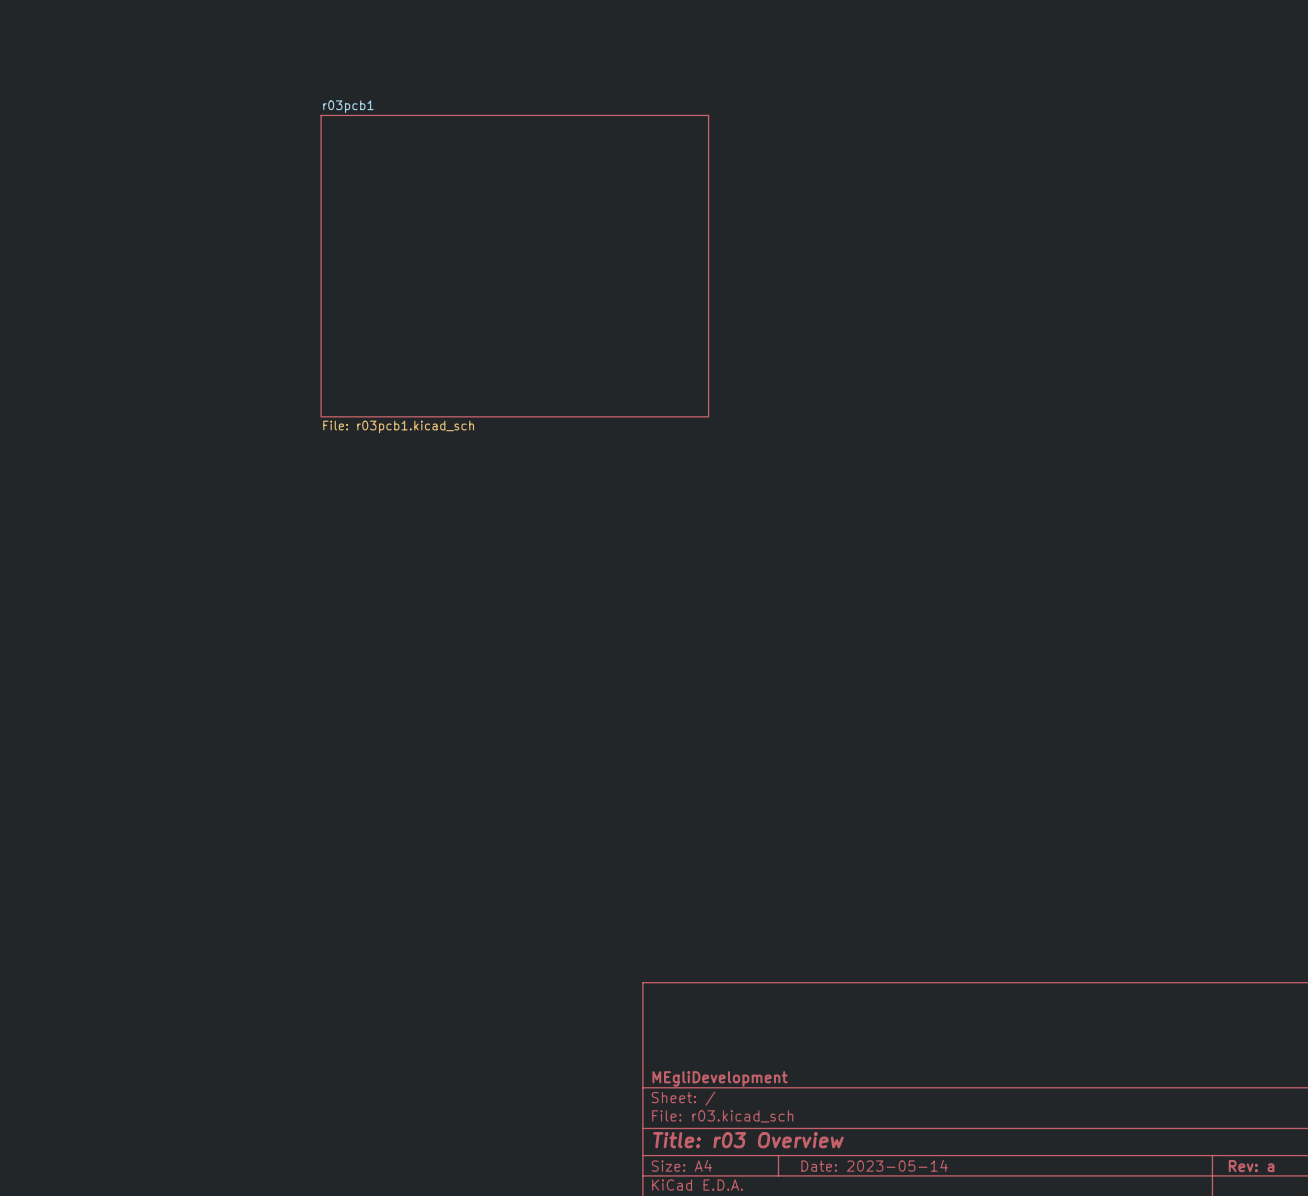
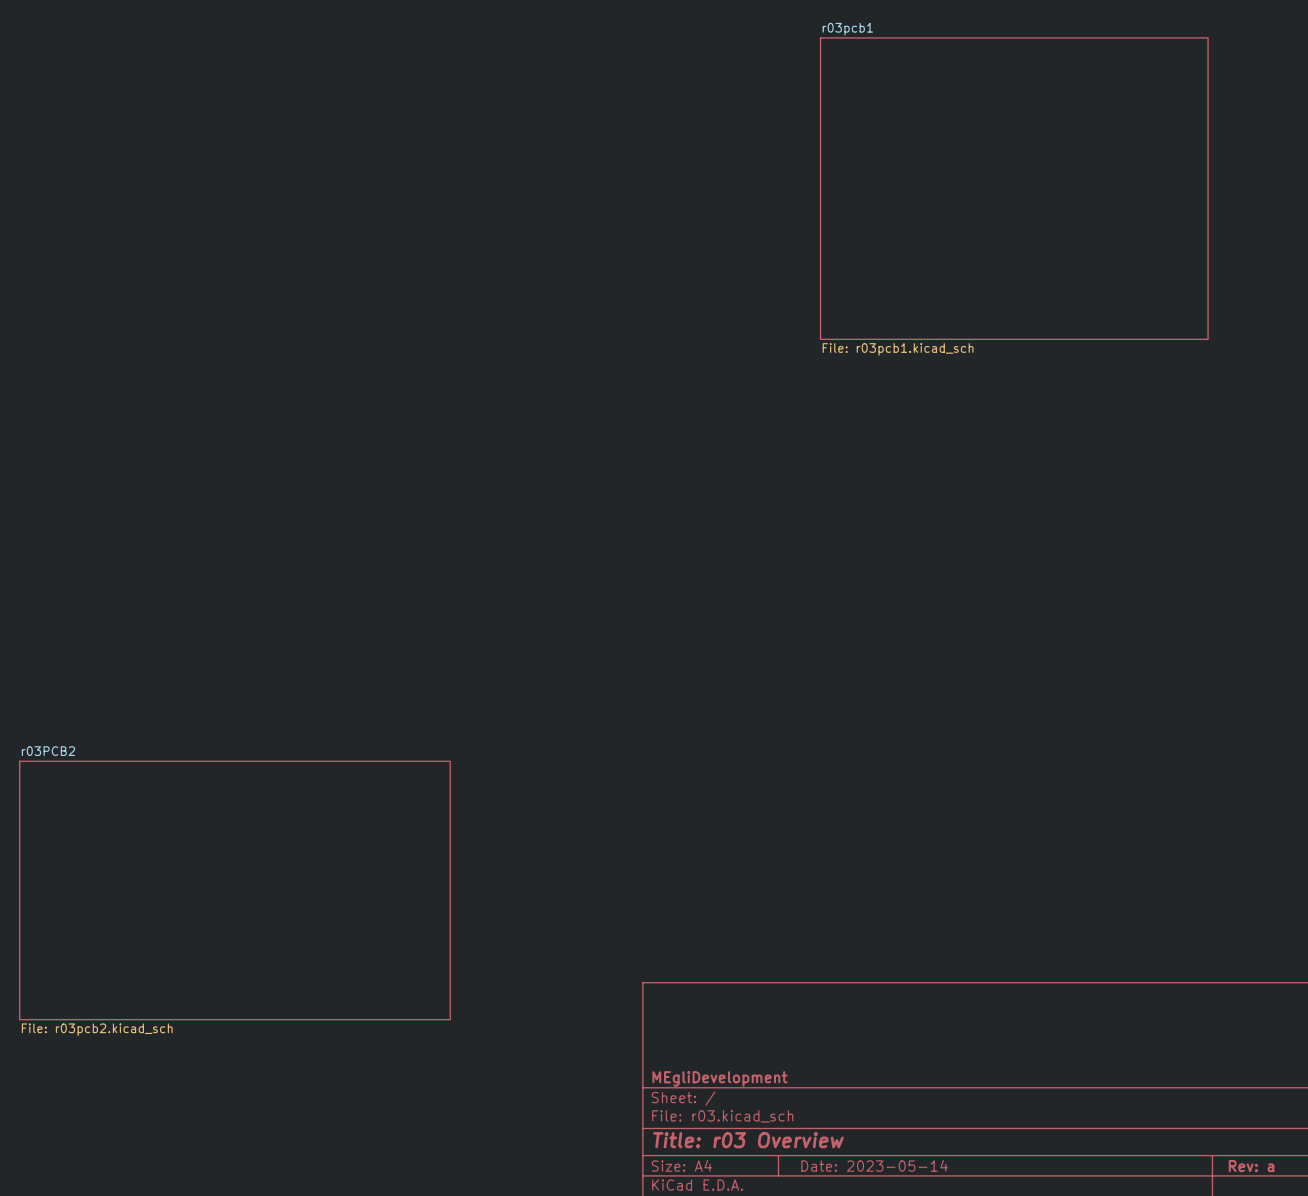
sheet r03pcb1 position: (514, 266) -> (1014, 188)
sheet r03PCB2: none -> File: r03pcb2.kicad_sch (234, 890)

